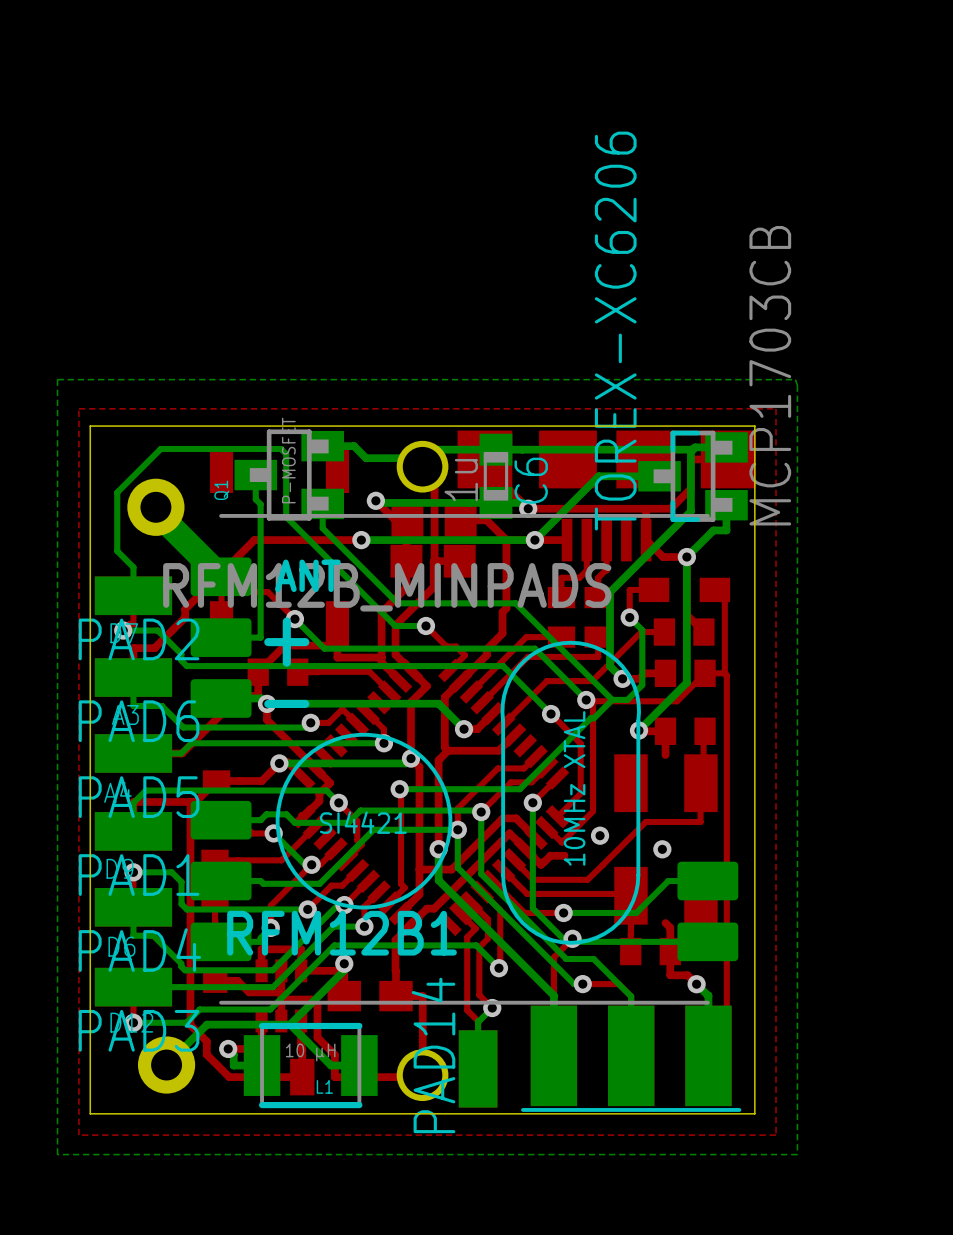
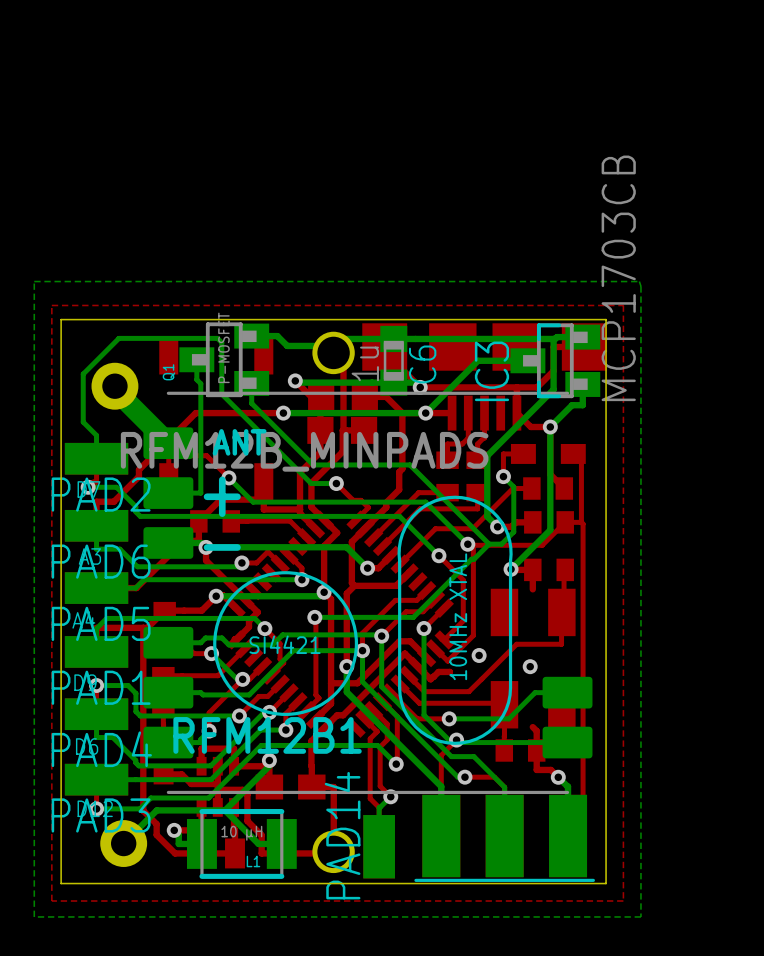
TOREX-XC6206 name: TOREX-XC6206 (615, 331) -> IC3 (491, 371)

